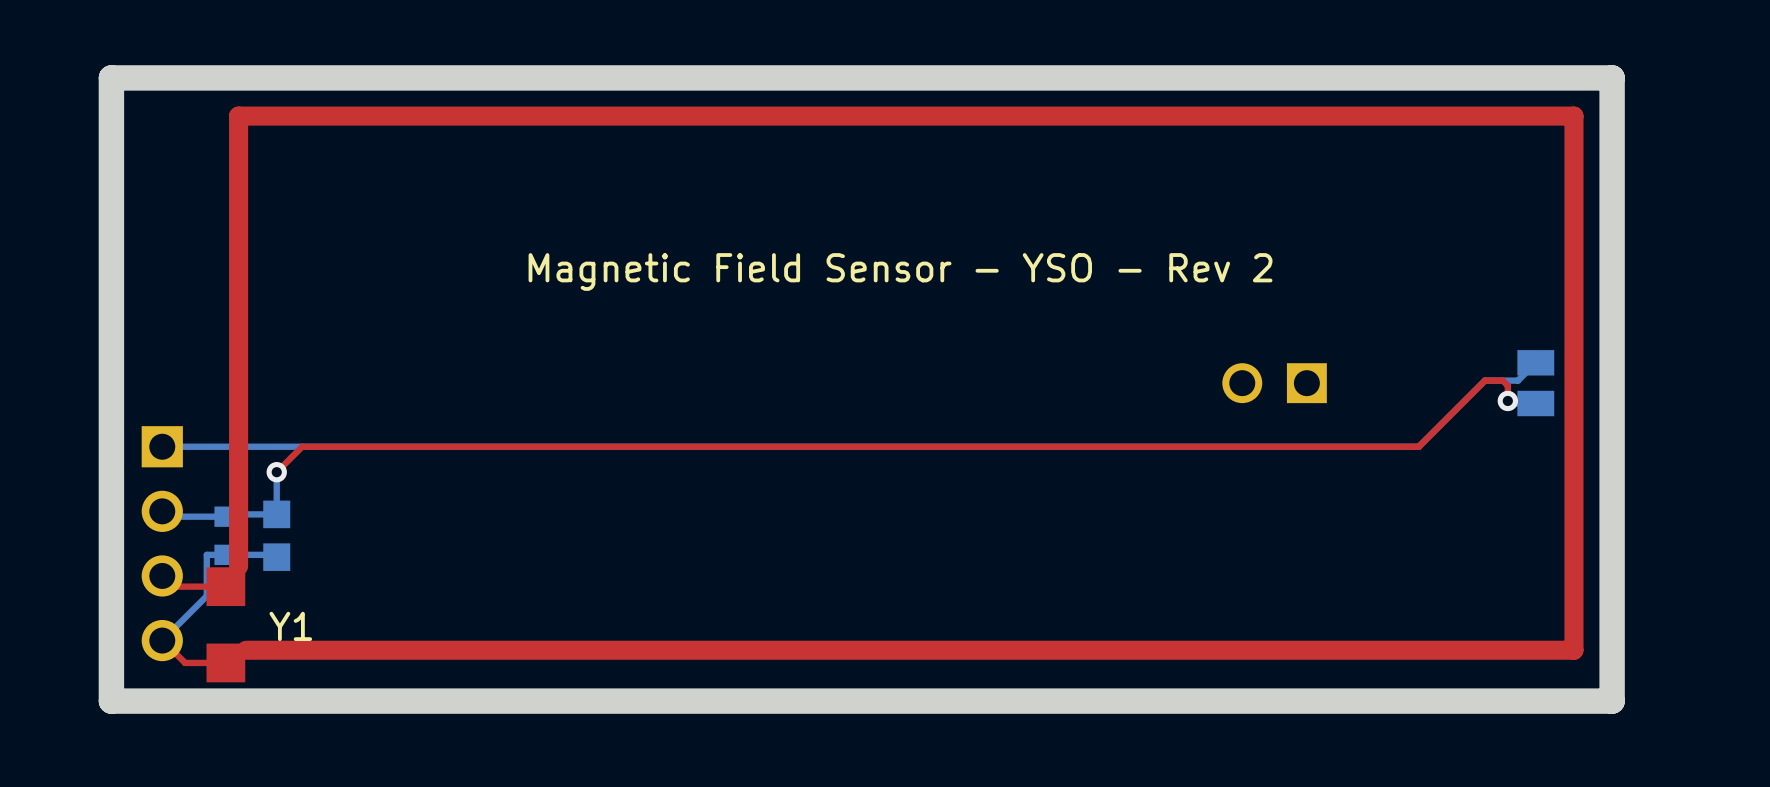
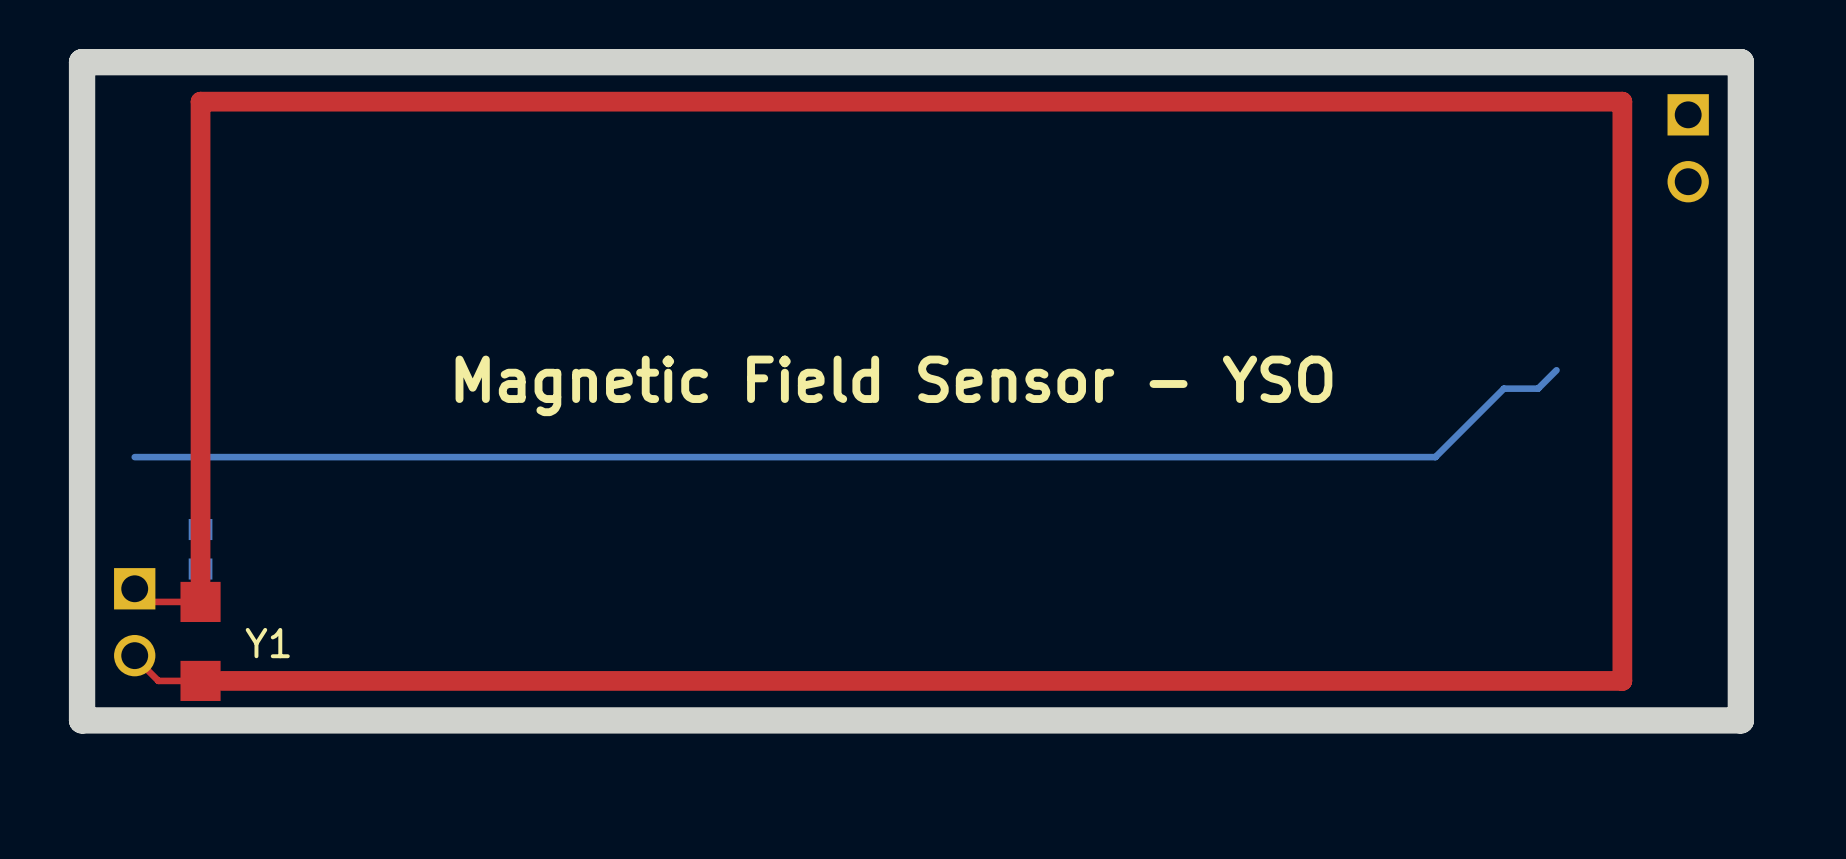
board edge: (111, 77) (1612, 77) (1612, 701) -> (82, 75) (82, 62) (1740, 62) (1740, 720) (1635, 720)
Y1 footprint: [206, 106, 1584, 683] -> [180, 91, 1633, 701]
text: Magnetic Field Sensor - YSO - Rev 2 (900, 271) -> none
text: none -> Magnetic Field Sensor - YSO (893, 385)
part rotation: 0° (1274, 383) -> 90° counterclockwise (1688, 148)
part position: (1274, 383) -> (1688, 148)
part: (1535, 383) -> none
top track: (1507, 400) (1507, 385) (1502, 380) (1484, 380) (1418, 446) (302, 446) (276, 472) -> none
via: (1507, 400) -> none
bottom track: (276, 472) (276, 514) (167, 516) (162, 511) -> none
via: (276, 472) -> none
part: (276, 535) -> none
part: (162, 543) -> none
bottom track: (276, 557) (274, 554) (206, 554) (206, 596) (162, 640) -> none
part: none -> (134, 622)

